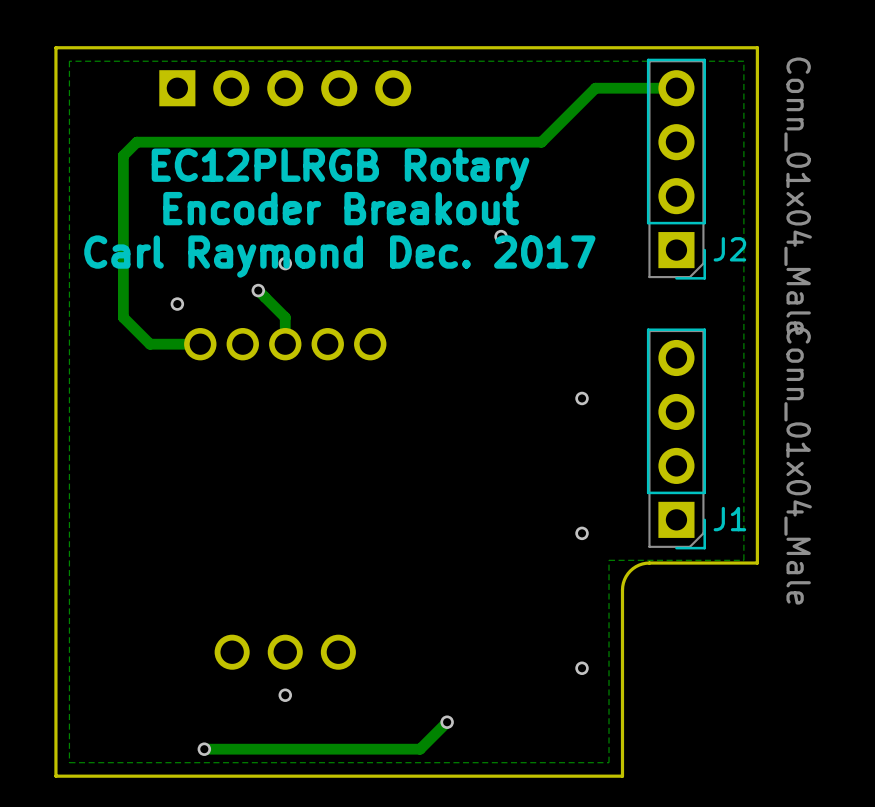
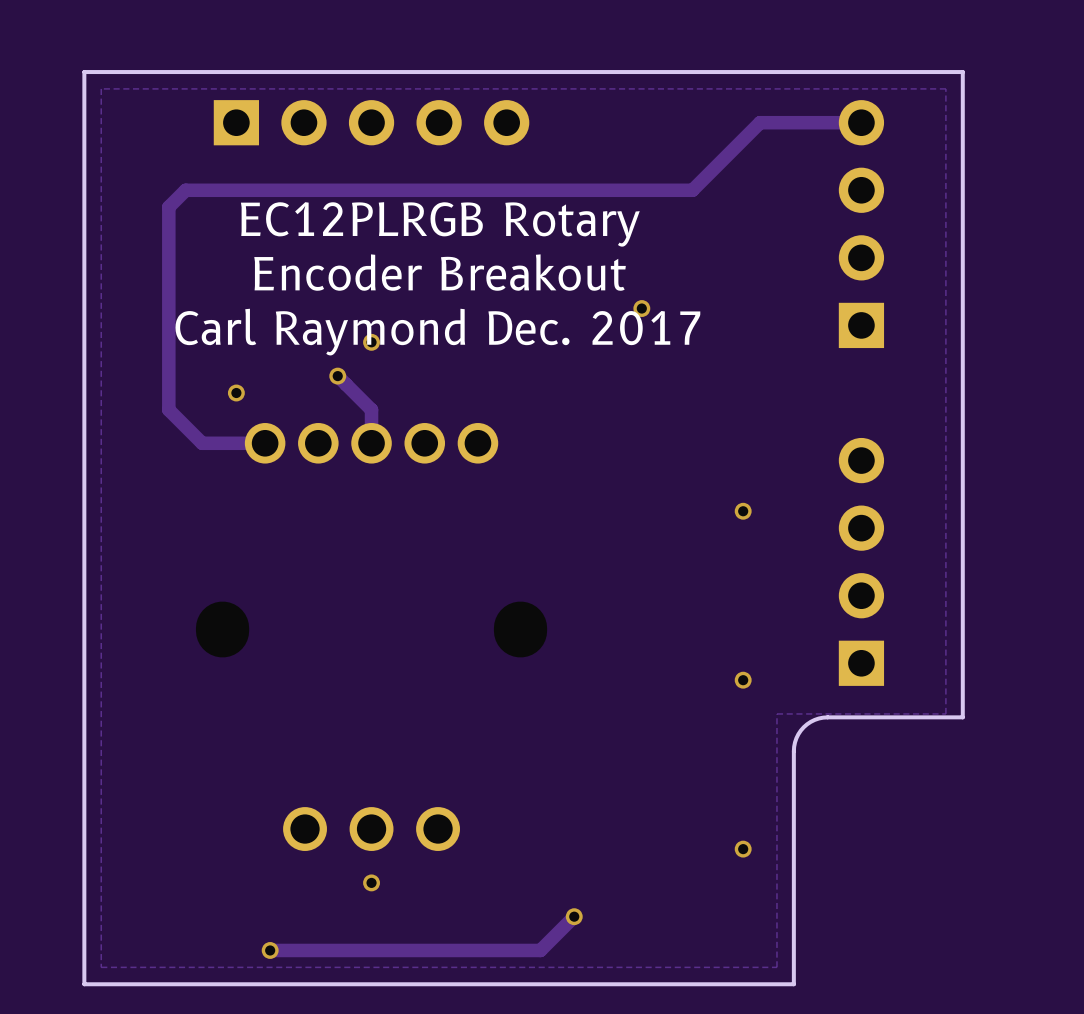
J2 side: bottom (676, 169) -> top (861, 224)
J1 side: bottom (676, 438) -> top (861, 561)

